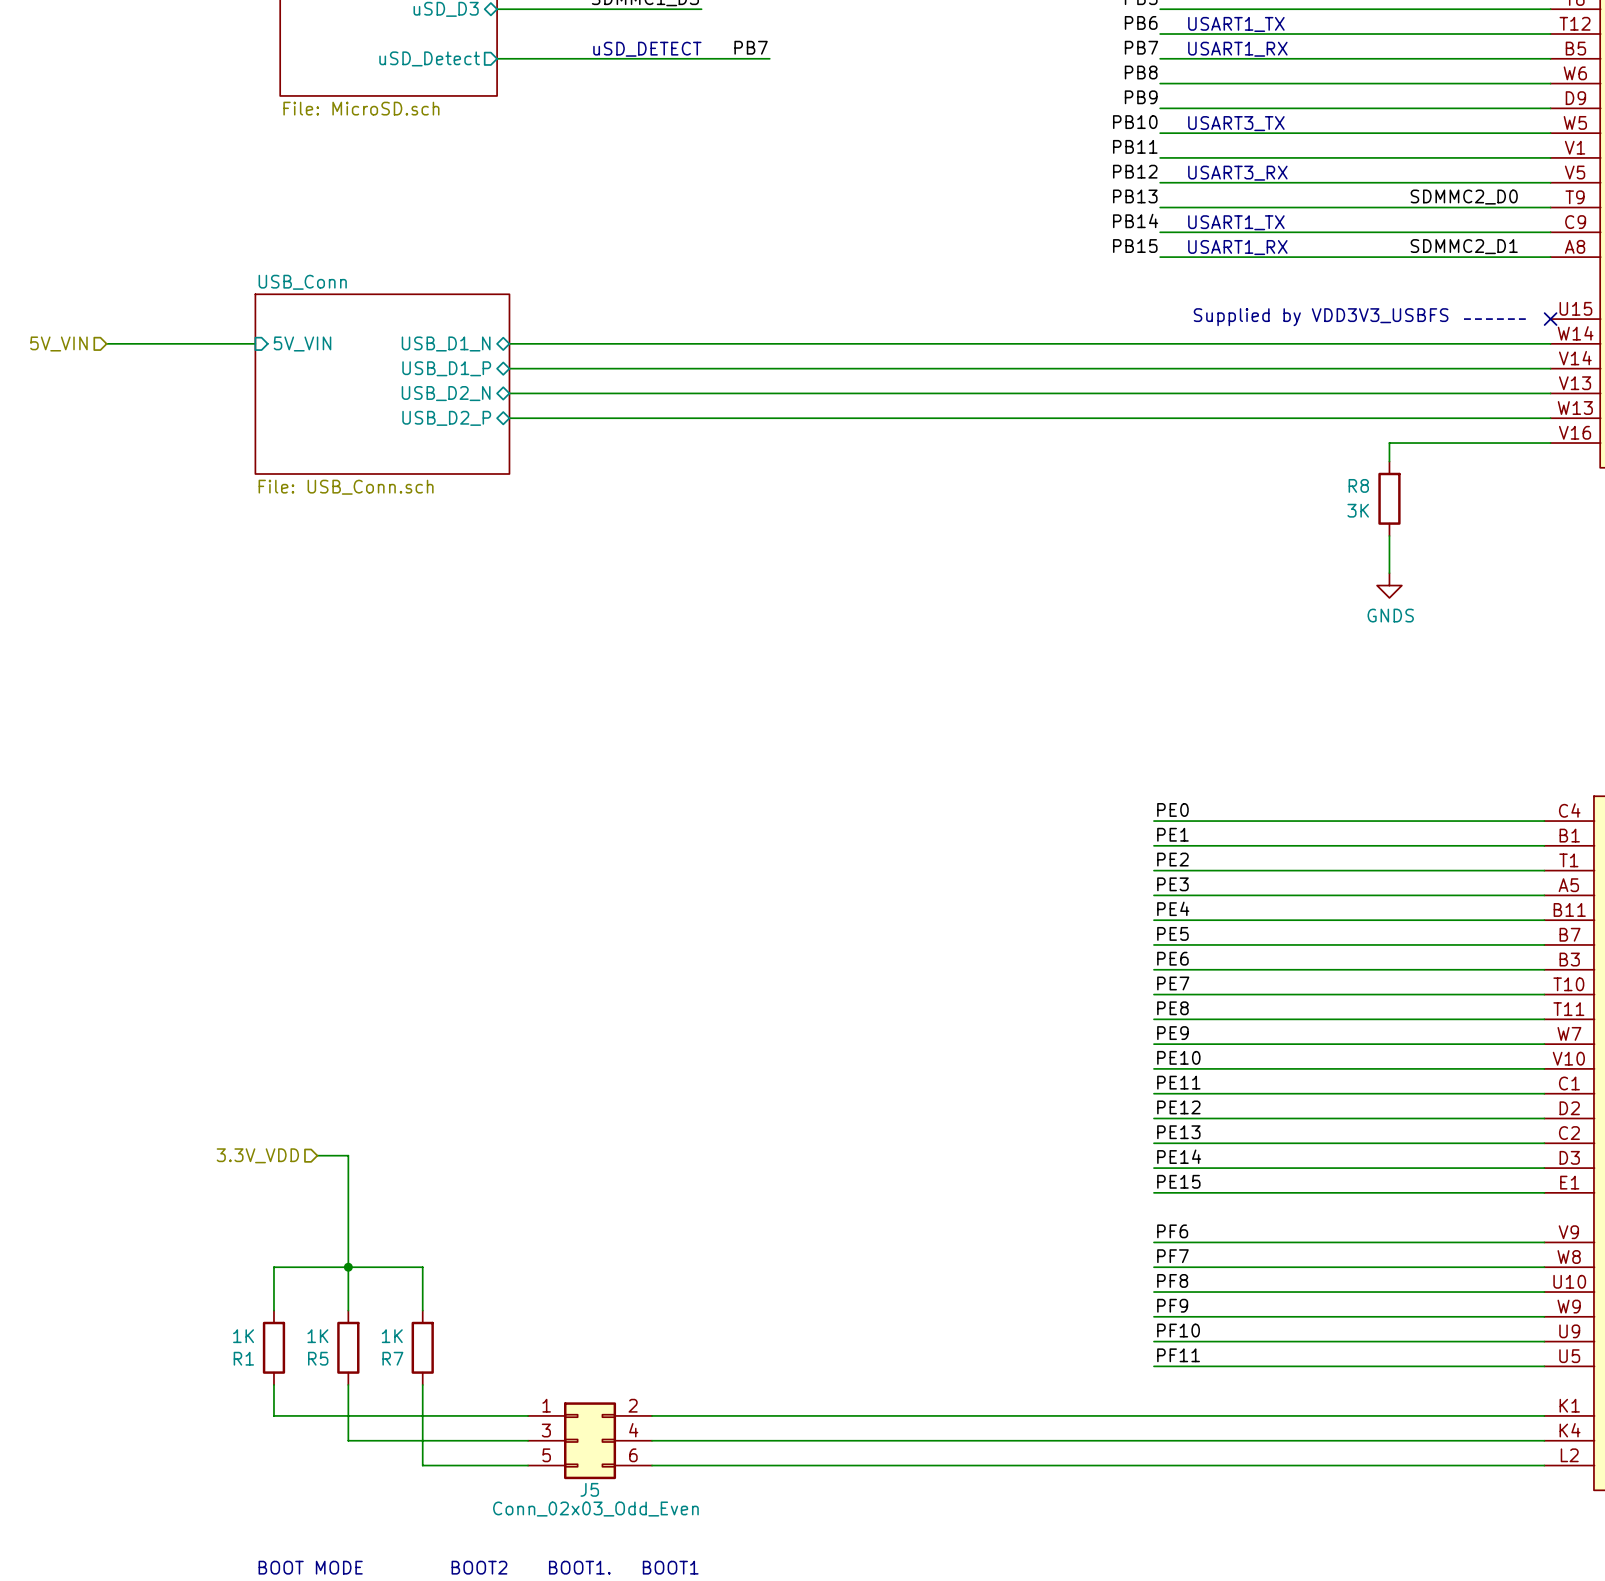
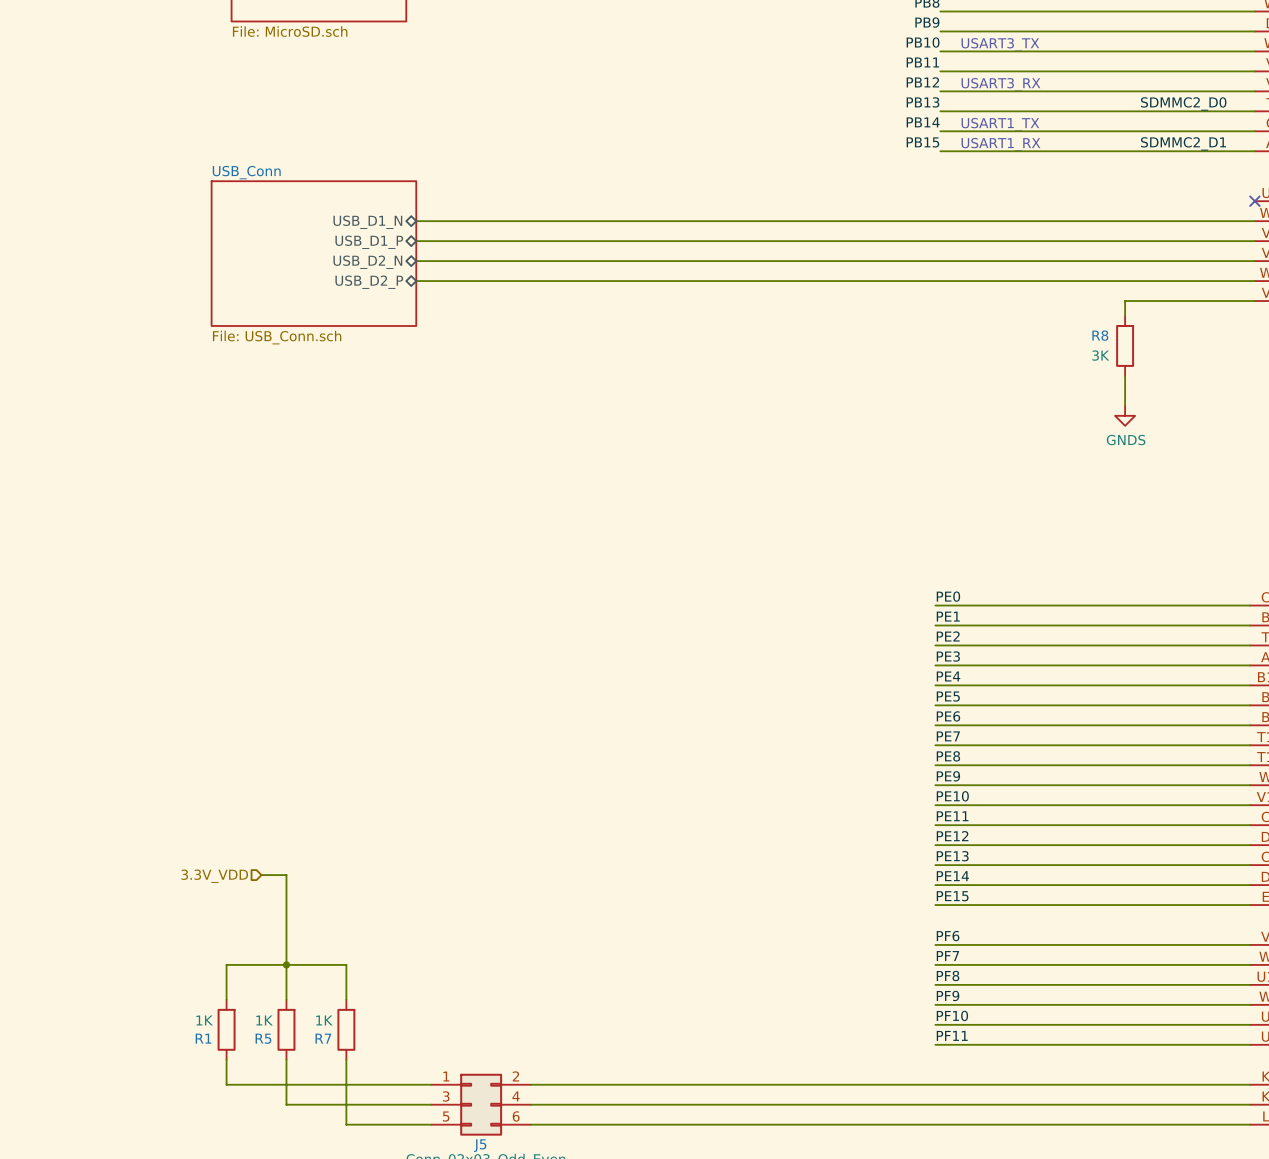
text: Supplied by VDD3V3_USBFS (1321, 317) -> none
line: (1463, 319) (1525, 319) -> none
hierarchical label: 5V_VIN (58, 343) -> none
wire: (106, 343) (255, 343) -> none
sheet pin: 5V_VIN (302, 343) -> none

